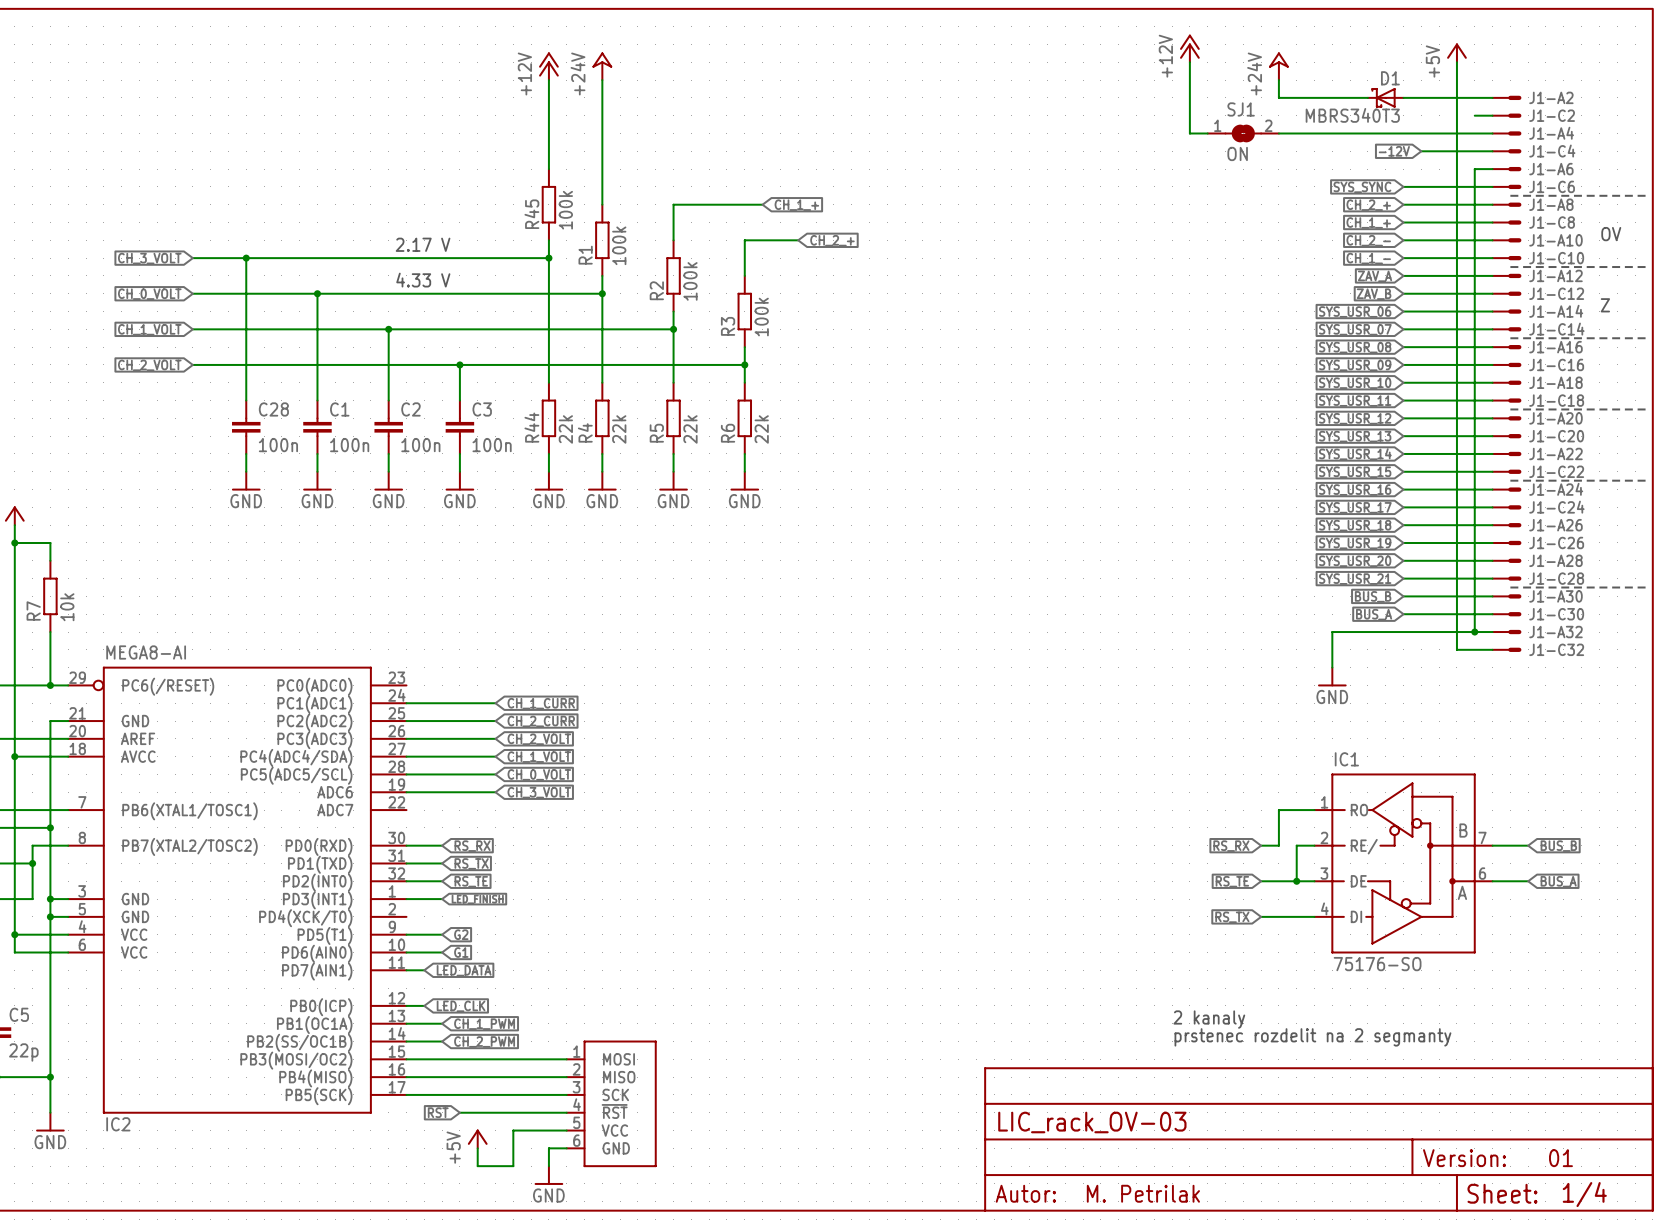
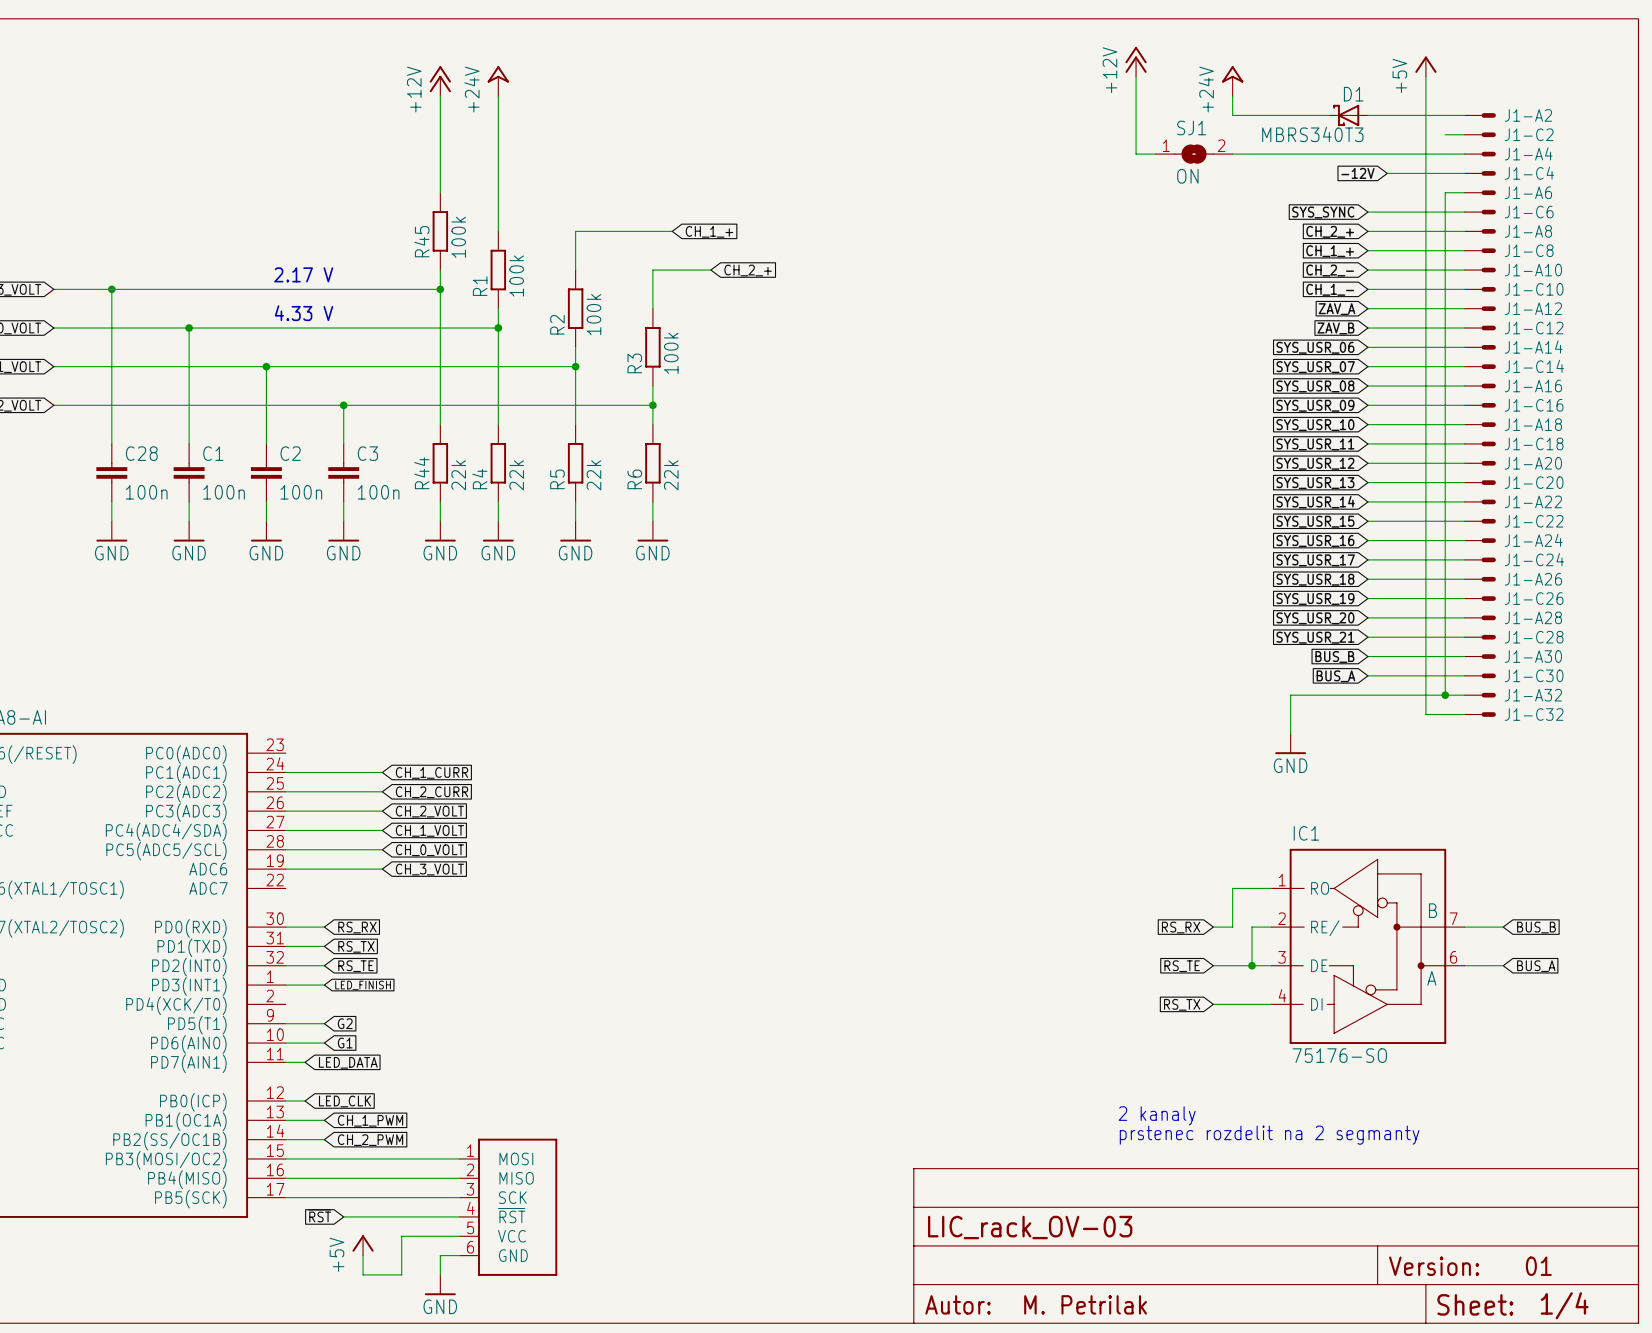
line: (1510, 195) (1645, 195) -> none
text: OV (1611, 234) -> none
line: (1510, 267) (1645, 267) -> none
text: Z (1605, 305) -> none
line: (1510, 338) (1645, 338) -> none
line: (1510, 409) (1645, 409) -> none
line: (1510, 480) (1645, 480) -> none
line: (1510, 587) (1645, 587) -> none

